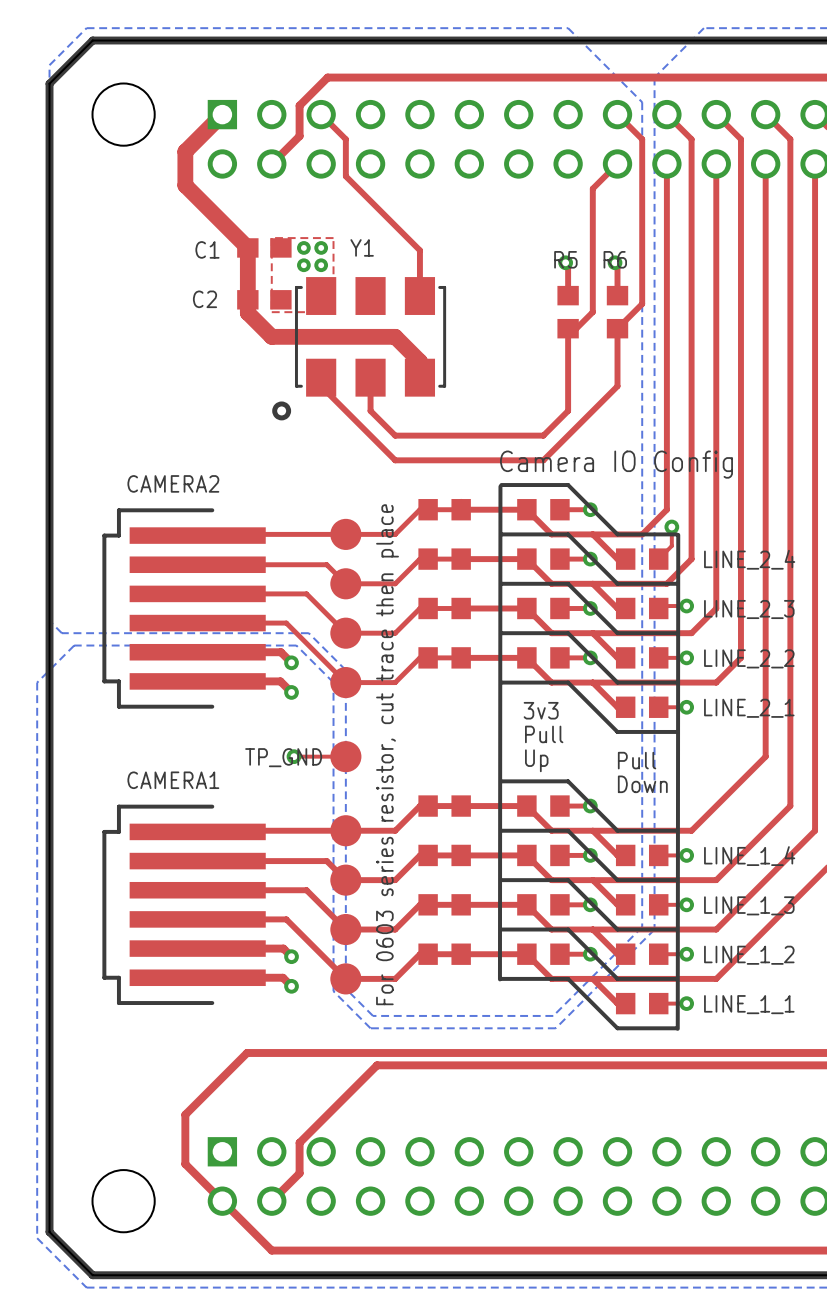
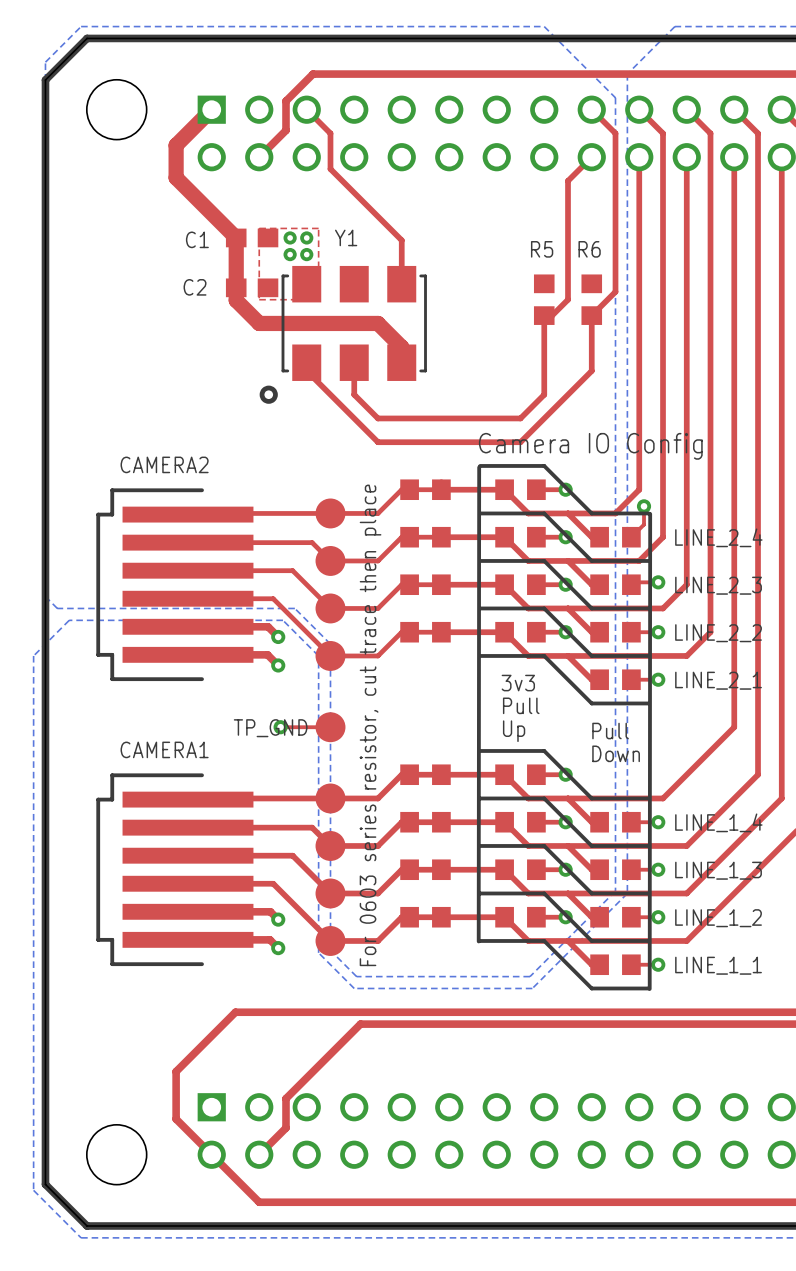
top track: (565, 262) (568, 265) (568, 295) -> none
via: (565, 262) -> none
top track: (615, 262) (617, 265) (617, 295) -> none
via: (615, 262) -> none

